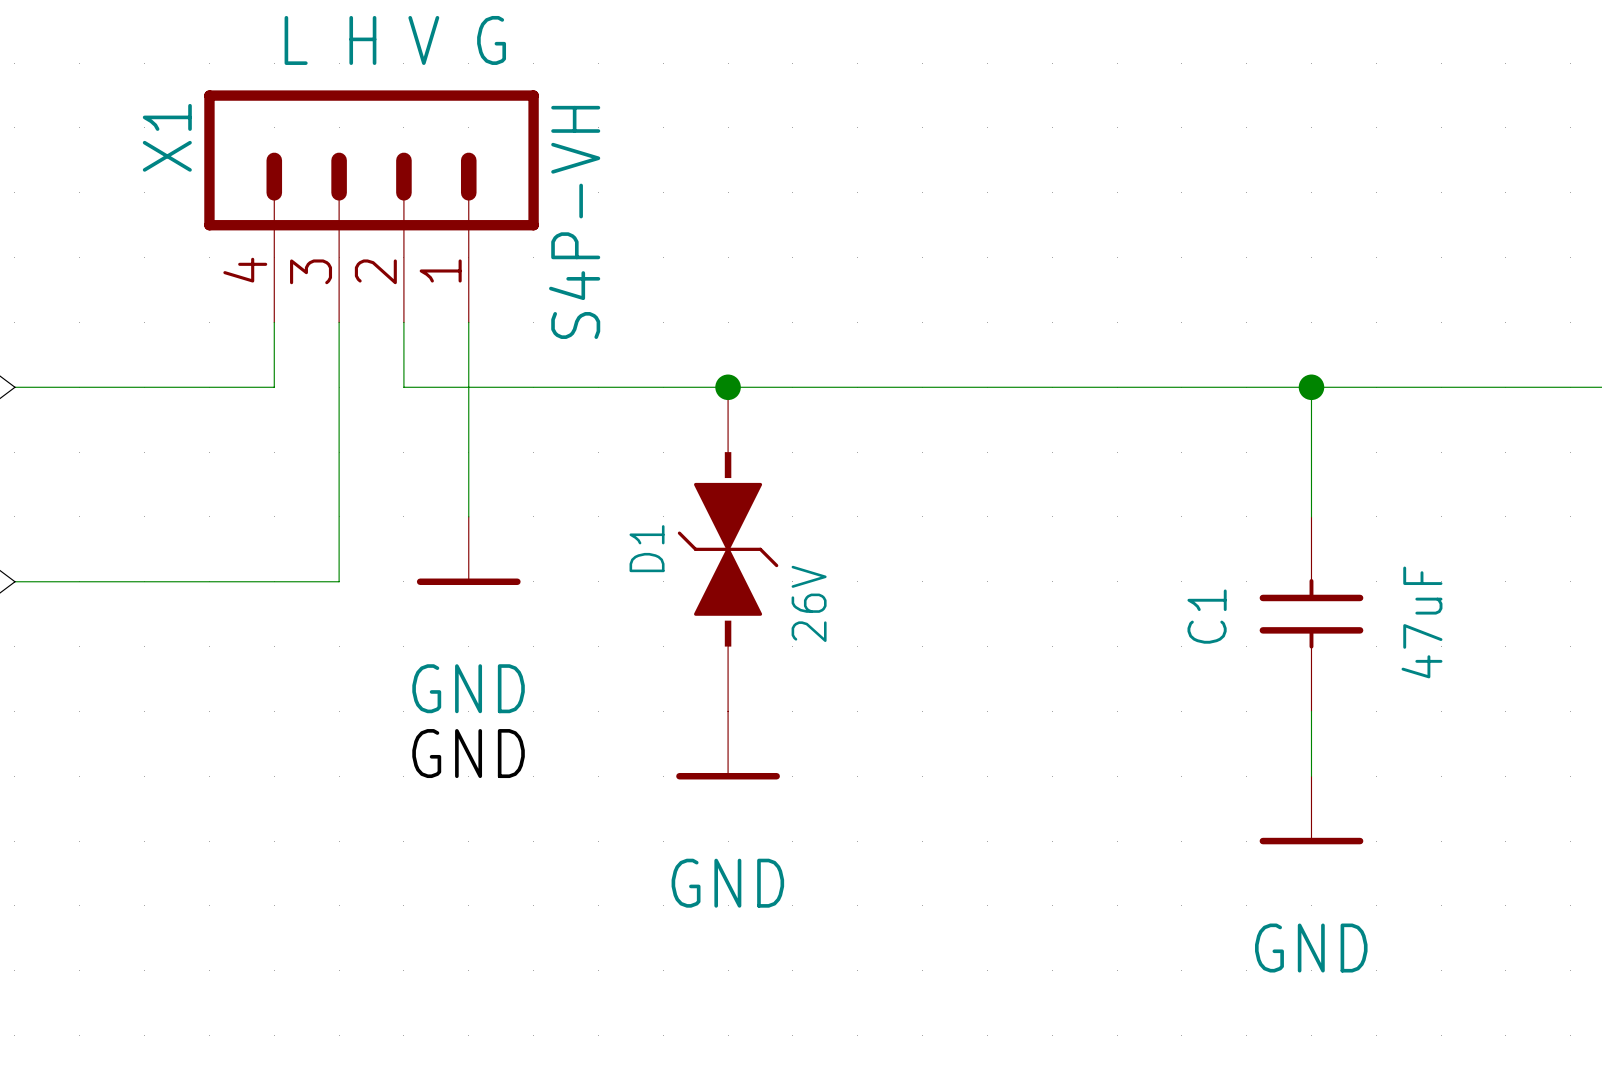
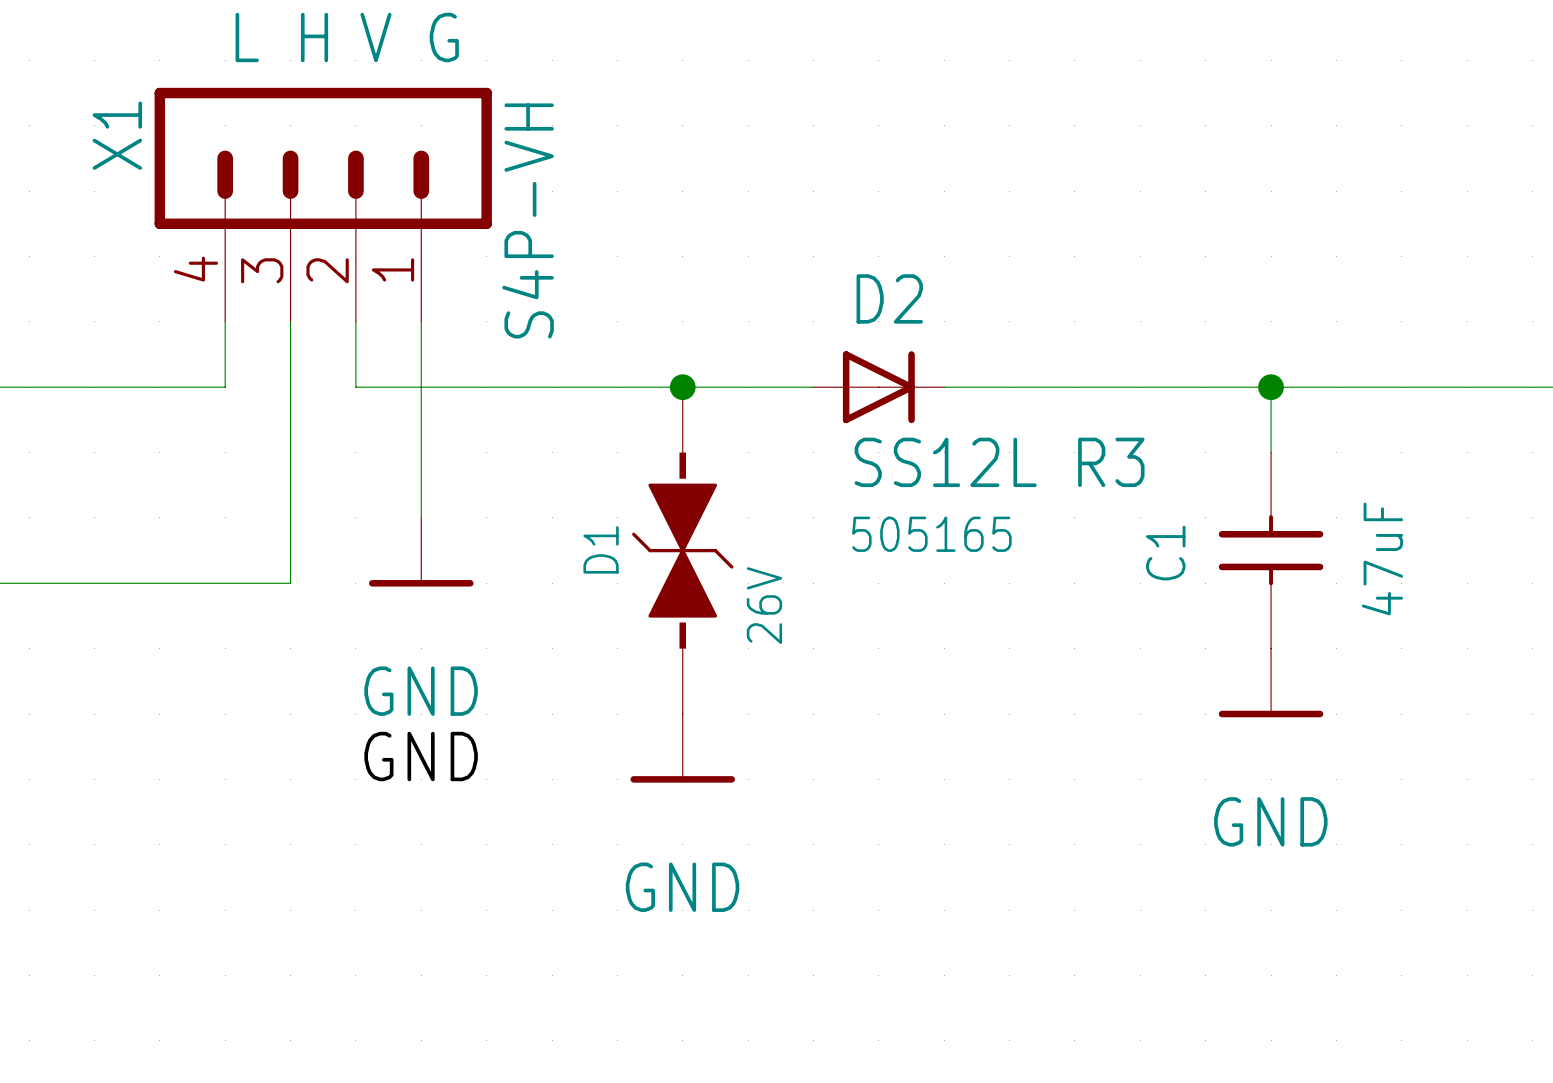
D2: none -> SS12L R3 (878, 387)
C1 position: (1311, 614) -> (1271, 550)
wire: (1311, 711) (1311, 776) -> none
power symbol position: GND (1311, 810) -> GND (1271, 682)

